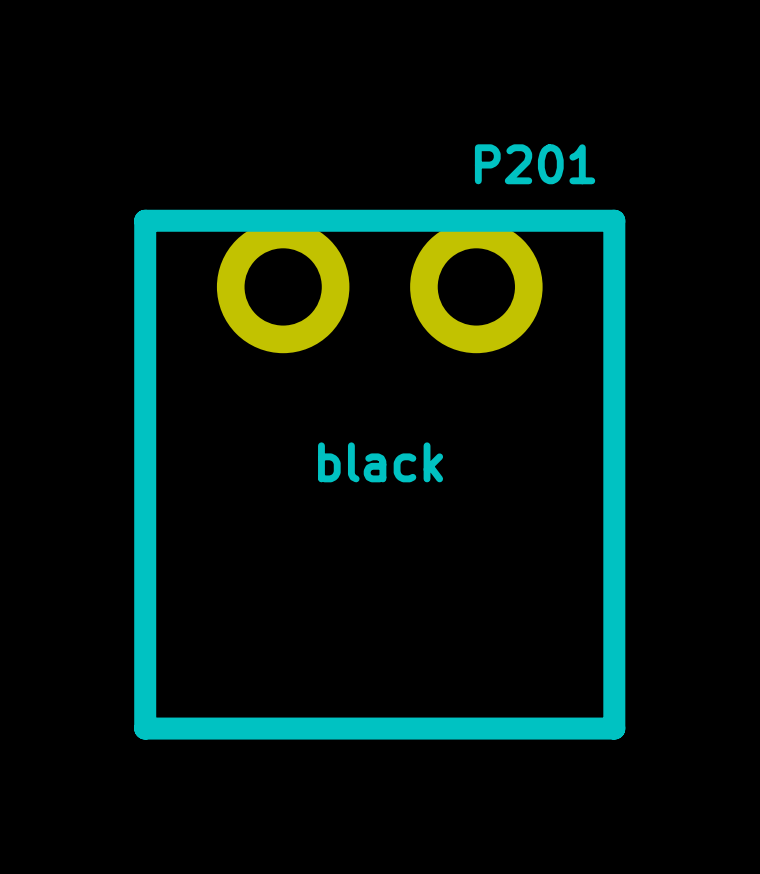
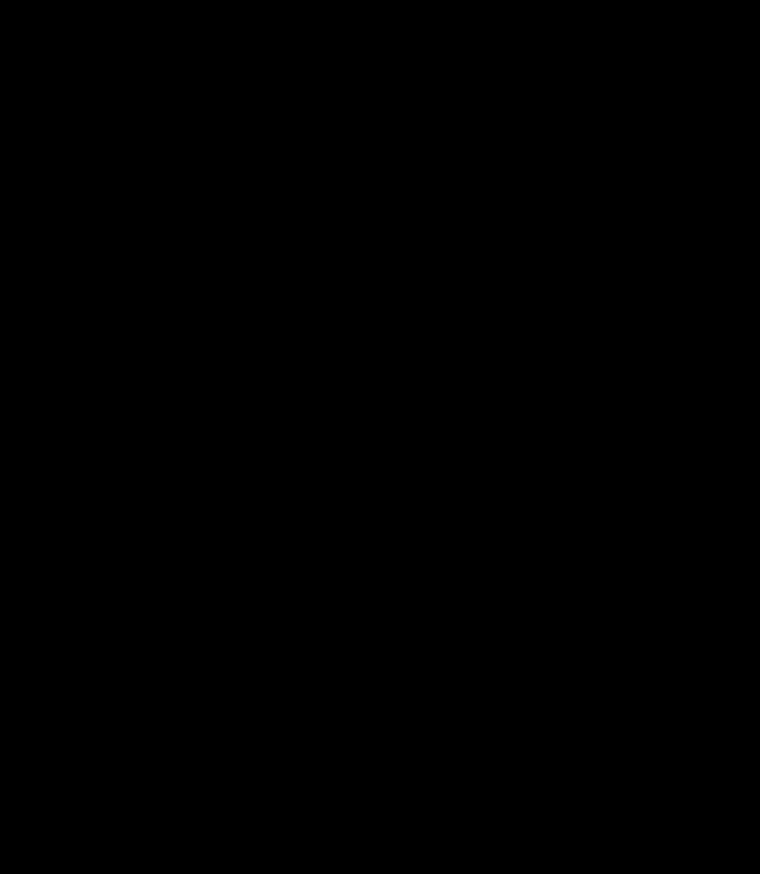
P201: black (379, 474) -> none

